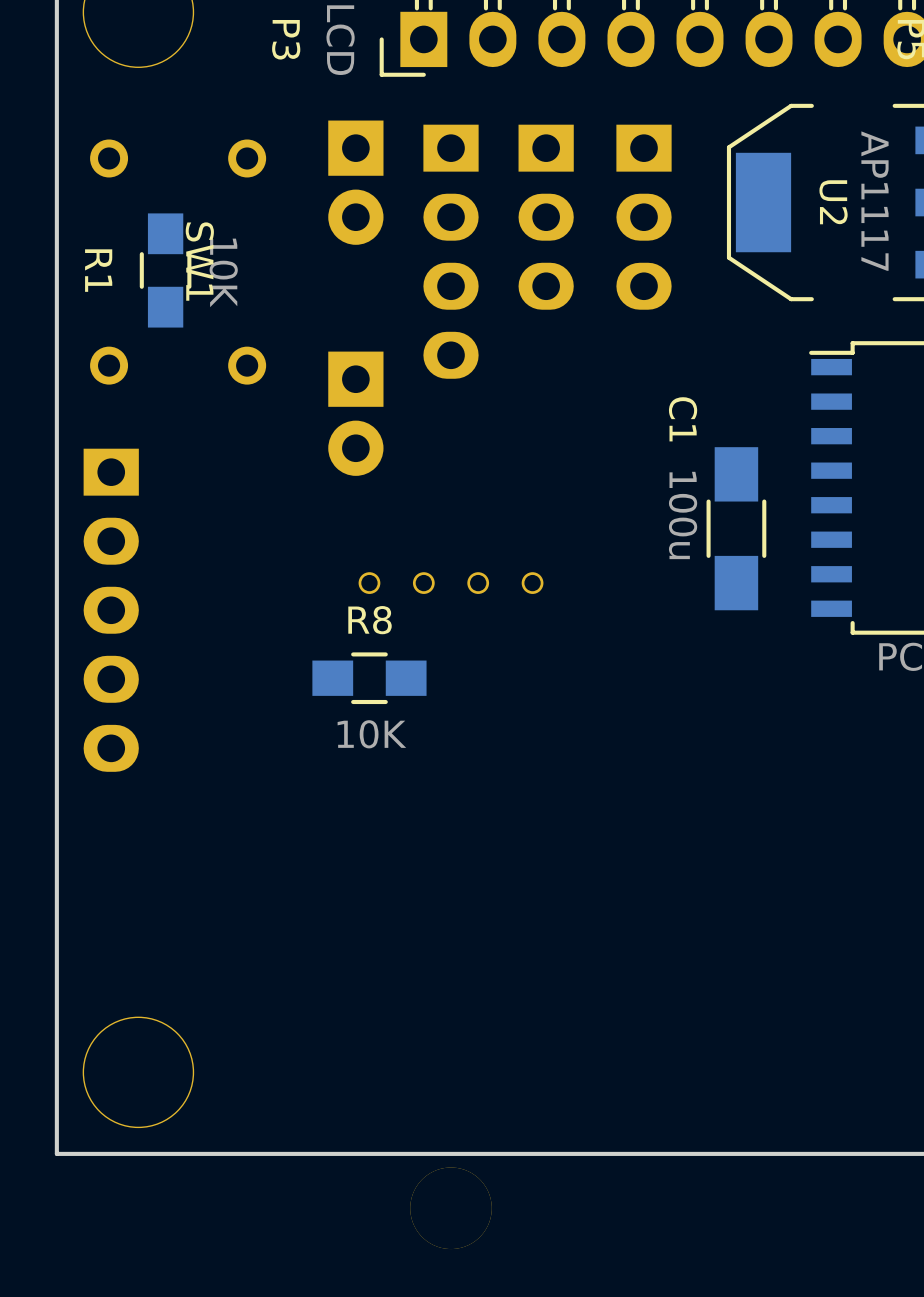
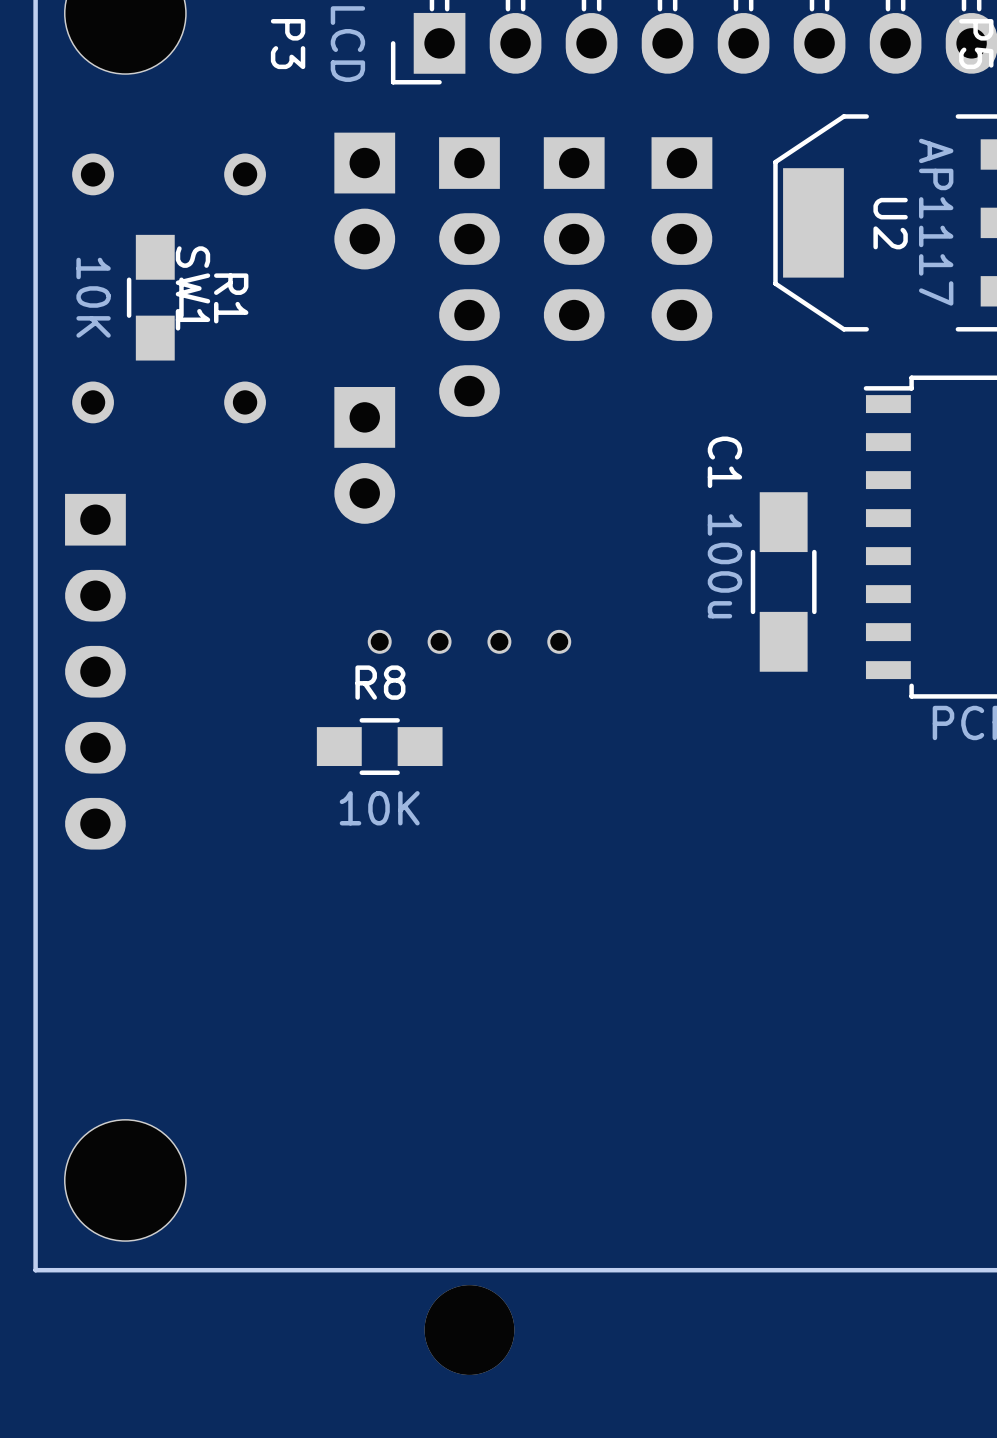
R1 name position: R1 (98, 270) -> R1 (231, 298)
R1 value position: 10K (223, 272) -> 10K (93, 297)

